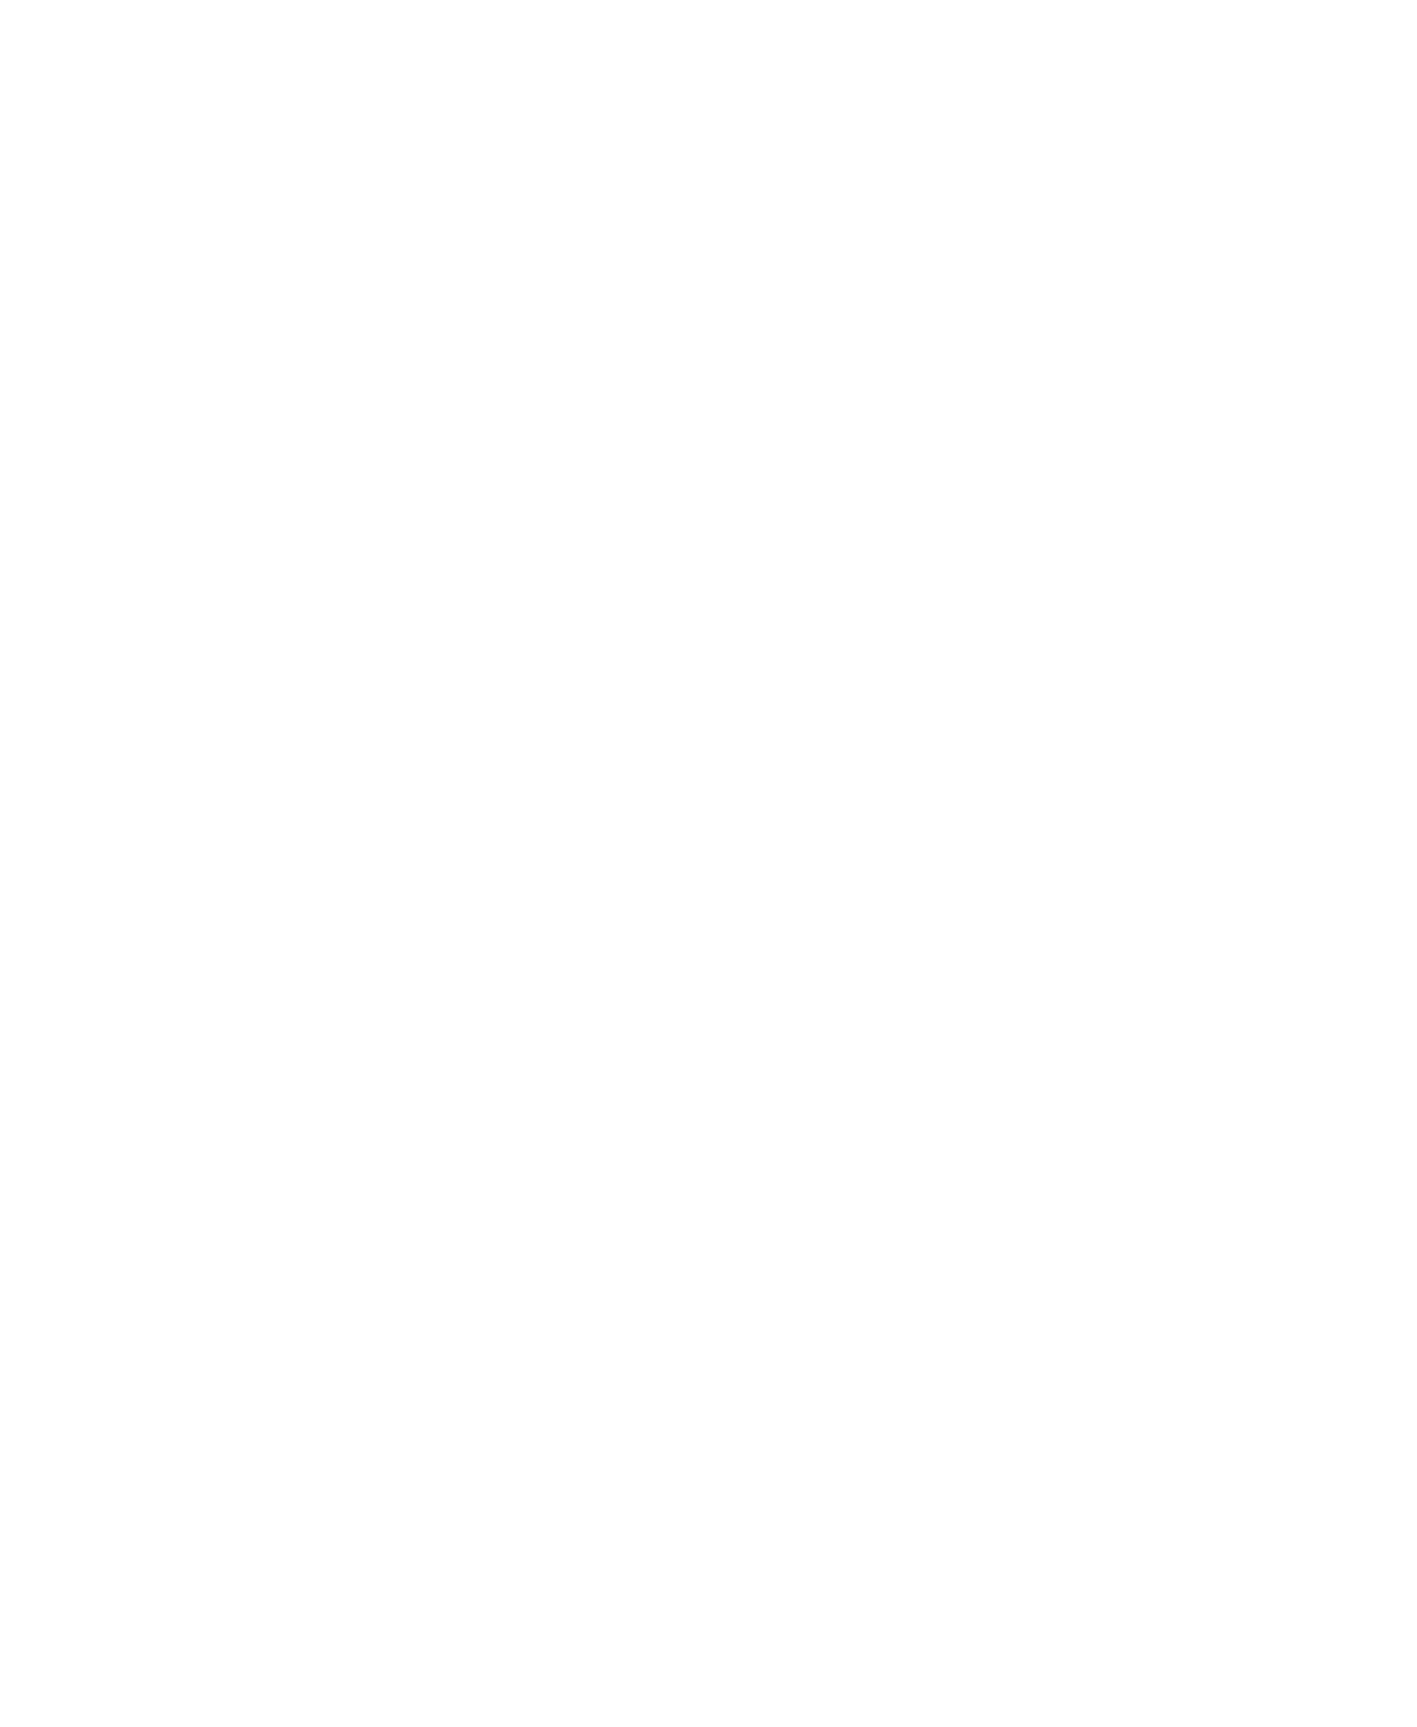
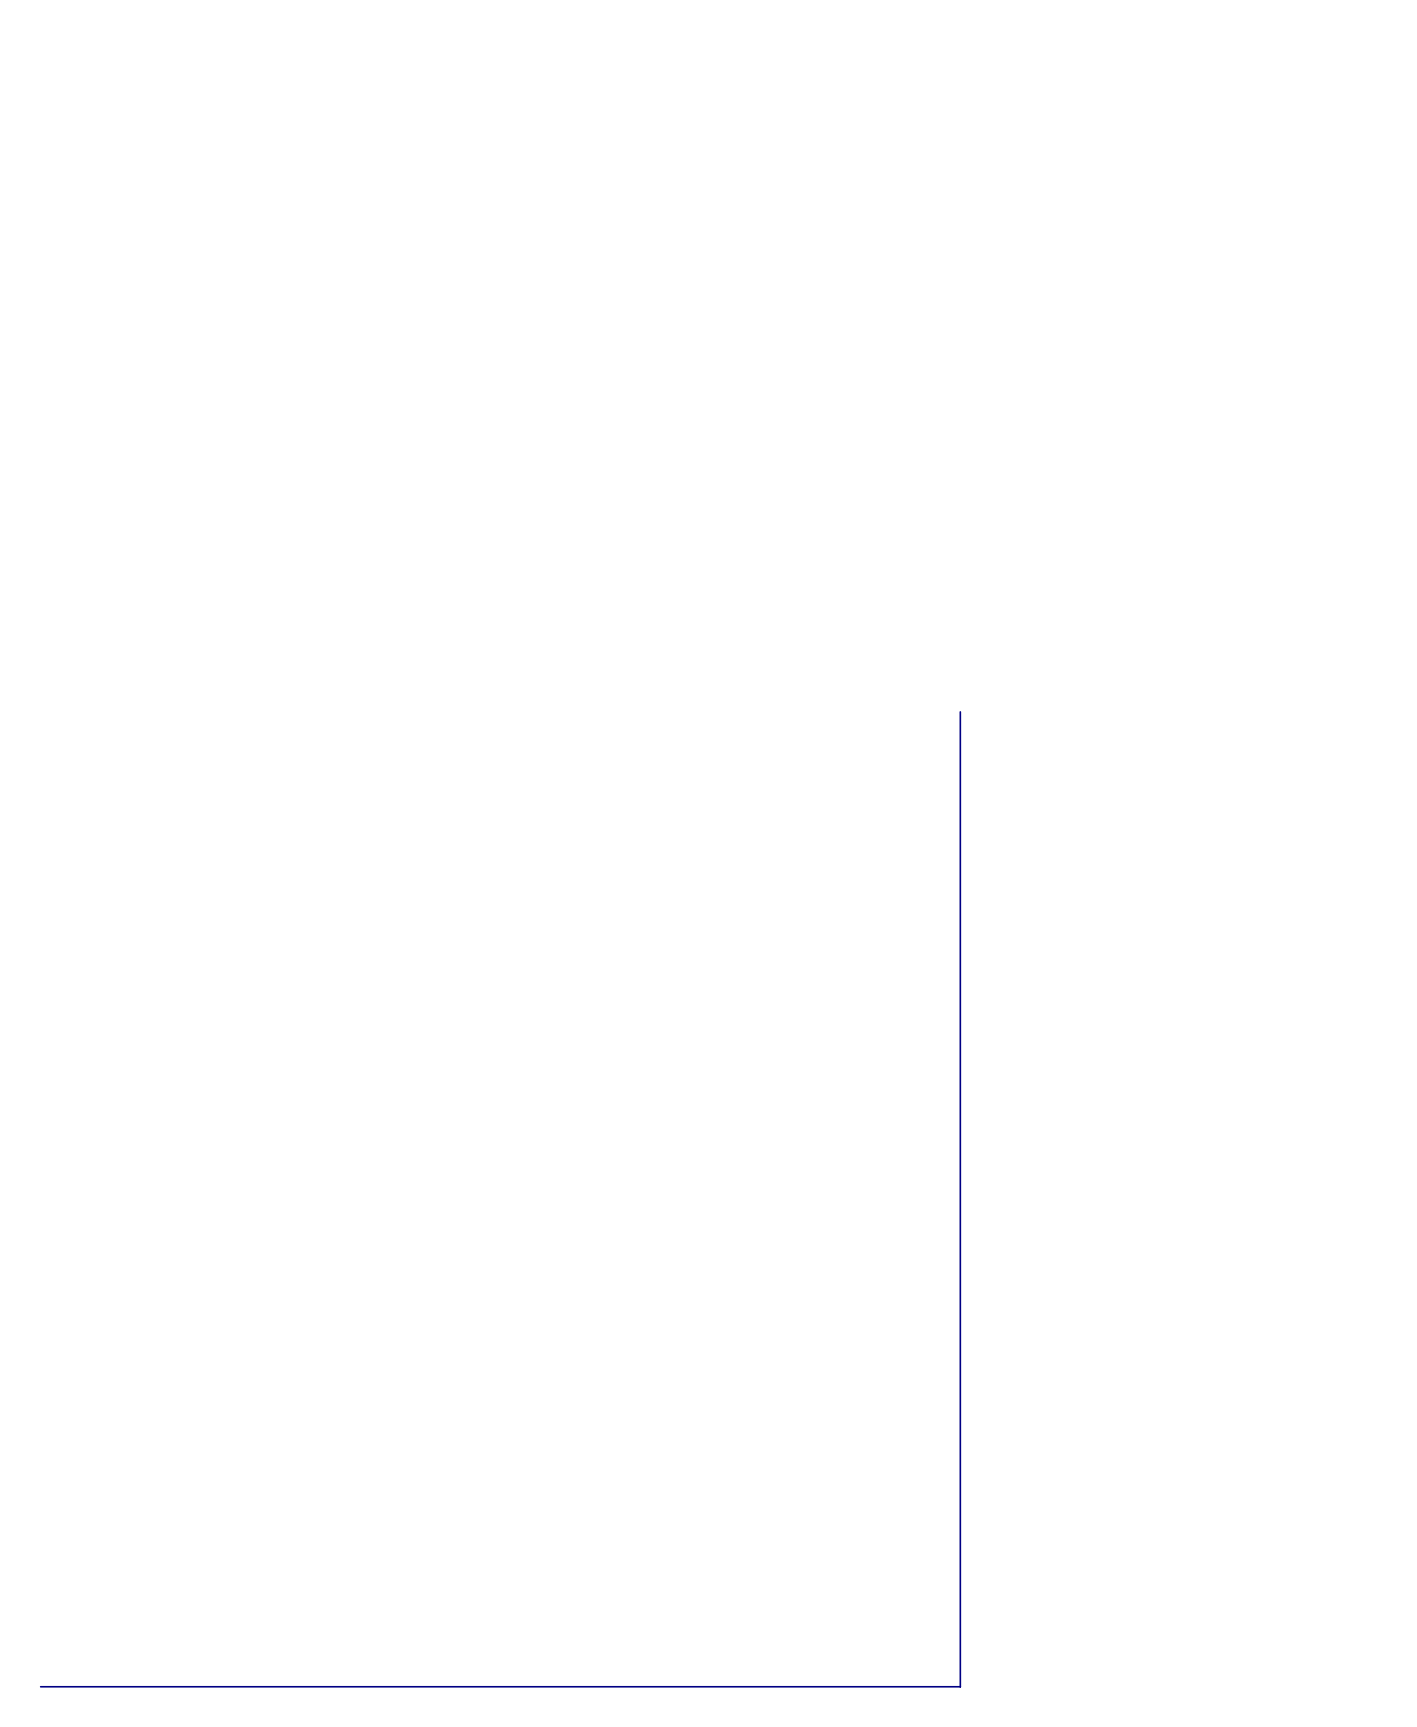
line: none -> (960, 711) (960, 1686) (40, 1686)

